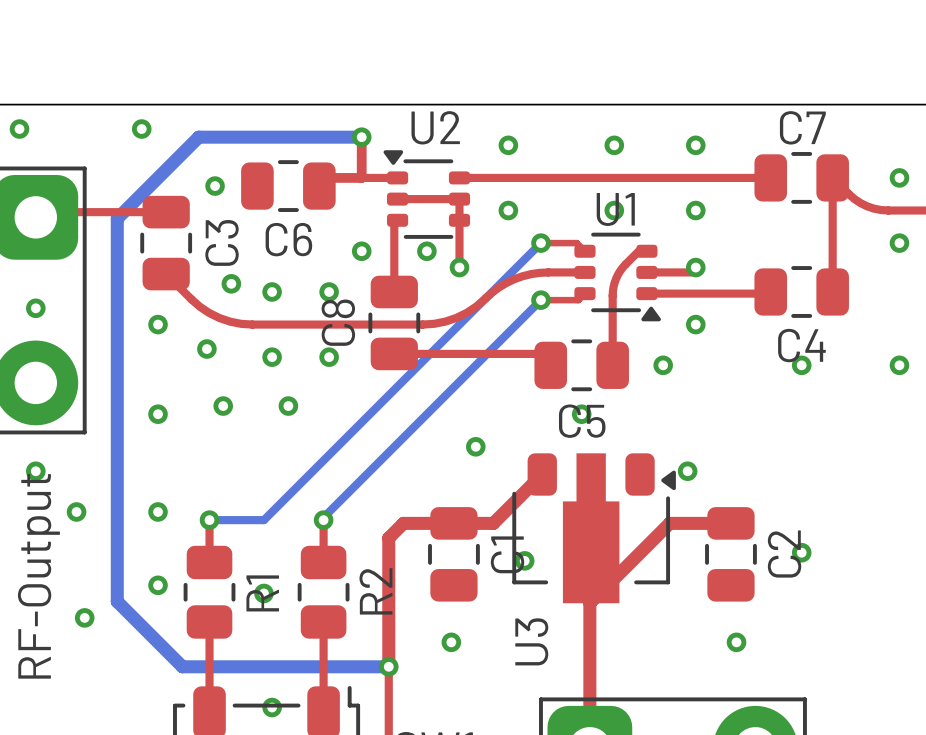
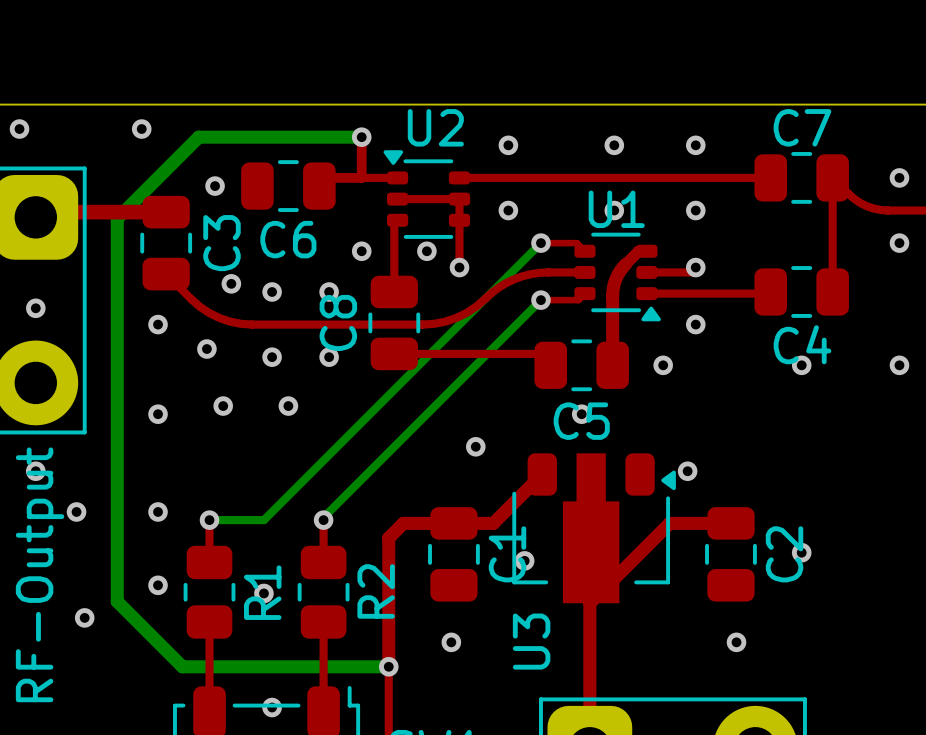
top track width: thin (41, 212) (166, 212) -> thick (41, 212) (166, 212)
top track width: thin (646, 251) (638, 251) (622, 267) (614, 282) (612, 295) (612, 365) -> thick (646, 251) (638, 251) (622, 267) (614, 282) (612, 295) (612, 365)

